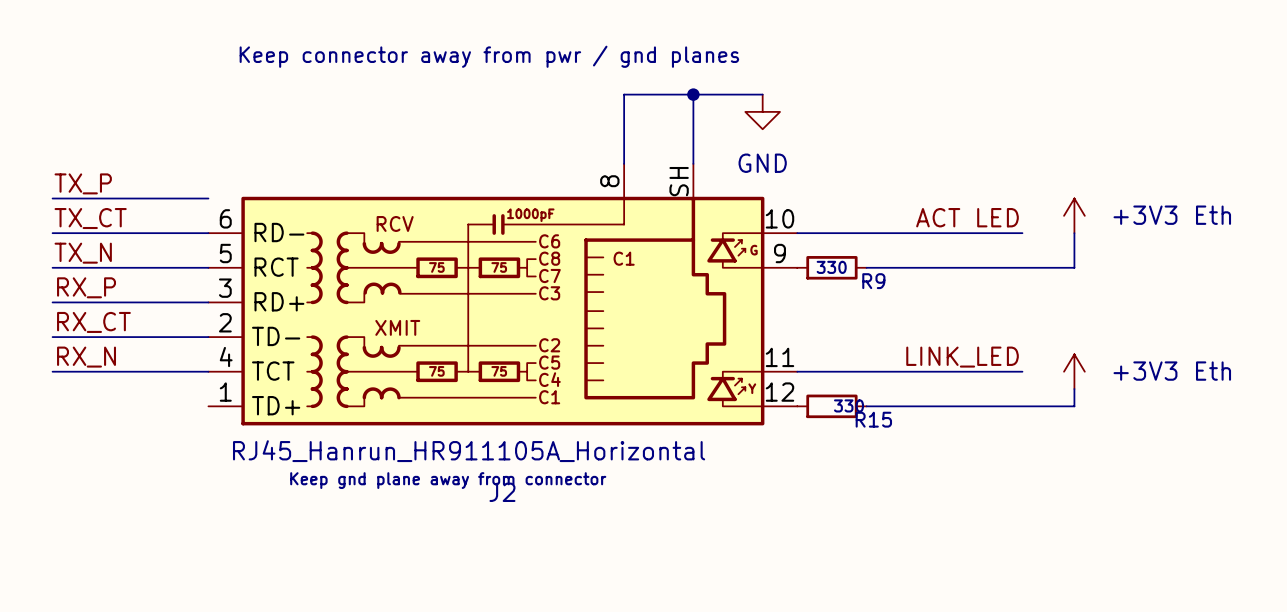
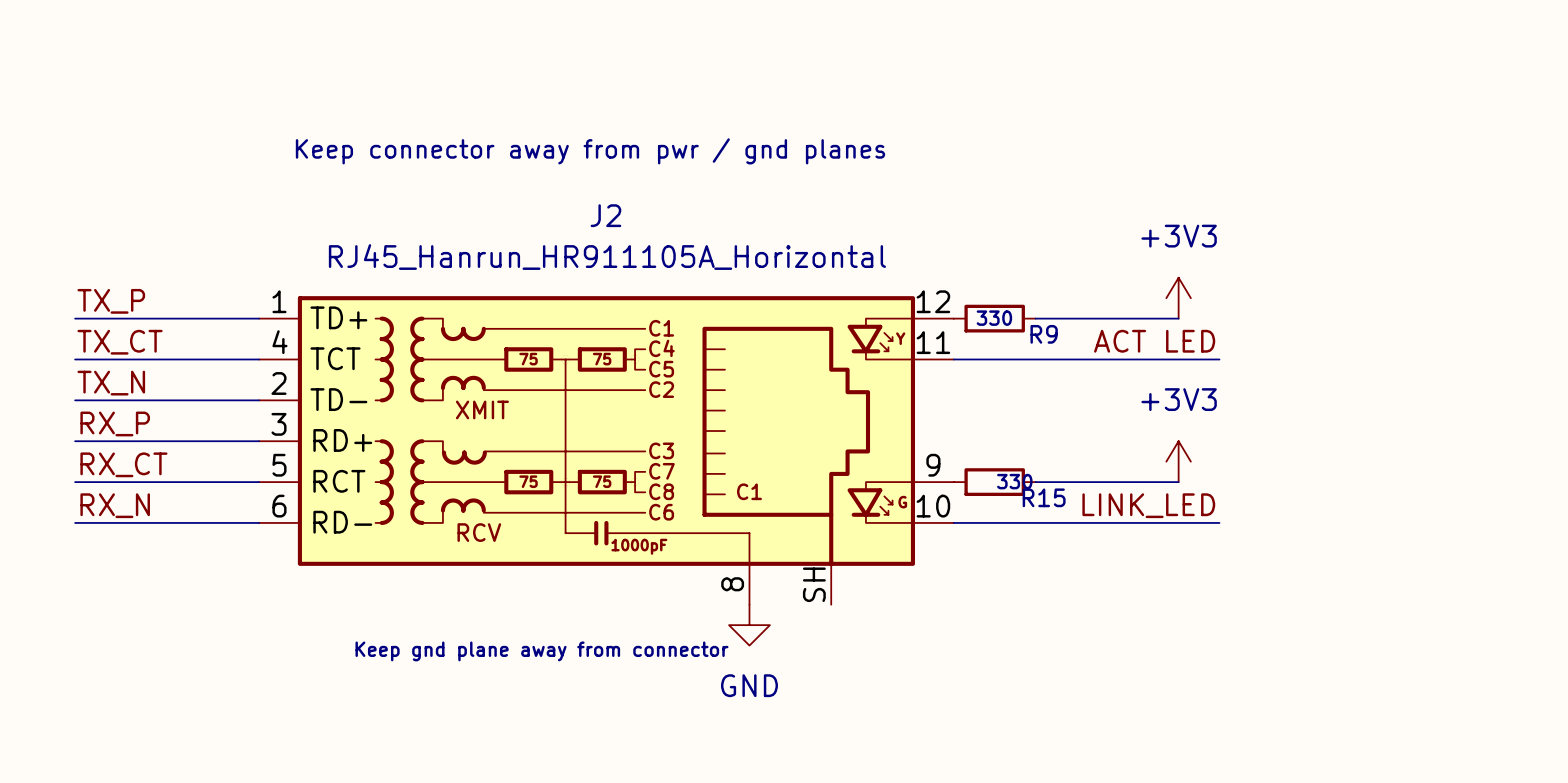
text position: Keep connector away from pwr / gnd planes (489, 56) -> Keep connector away from pwr / gnd planes (590, 151)
wire: (693, 94) (693, 163) -> none
junction: (693, 94) -> none
wire: (762, 94) (624, 94) (624, 163) -> none
power symbol: GND (762, 111) -> none
label: TX_P (83, 183) -> none
wire: (52, 198) (208, 198) -> (75, 482) (259, 482)
power symbol: +3V3 Eth (1074, 215) -> none
label position: ACT LED (967, 217) -> ACT LED (1154, 341)
label: TX_CT (90, 218) -> none
wire: (52, 233) (208, 233) -> (75, 522) (259, 522)
wire: (797, 233) (1022, 233) -> (953, 522) (1219, 522)
wire: (1074, 233) (1074, 267) (987, 267) -> none
power symbol: none -> +3V3 (1178, 298)
label: TX_N (83, 253) -> TX_P (111, 301)
label: RX_P (86, 287) -> TX_CT (120, 342)
J2 flip: as is (502, 311) -> up-down (606, 431)
label: RX_CT (93, 322) -> TX_N (111, 383)
label: RX_N (86, 357) -> RX_P (115, 423)
label position: LINK_LED (962, 357) -> LINK_LED (1148, 505)
wire: (797, 371) (1022, 371) -> (953, 359) (1219, 359)
power symbol: +3V3 Eth (1074, 371) -> none
power symbol: none -> +3V3 (1178, 461)
wire: (1074, 389) (1074, 406) (987, 406) -> none
label: none -> RX_CT (123, 464)
label: none -> RX_N (115, 505)
J2 value position: RJ45_Hanrun_HR911105A_Horizontal (469, 451) -> RJ45_Hanrun_HR911105A_Horizontal (607, 257)
text position: Keep gnd plane away from connector (448, 480) -> Keep gnd plane away from connector (541, 651)
power symbol: none -> GND (749, 625)

